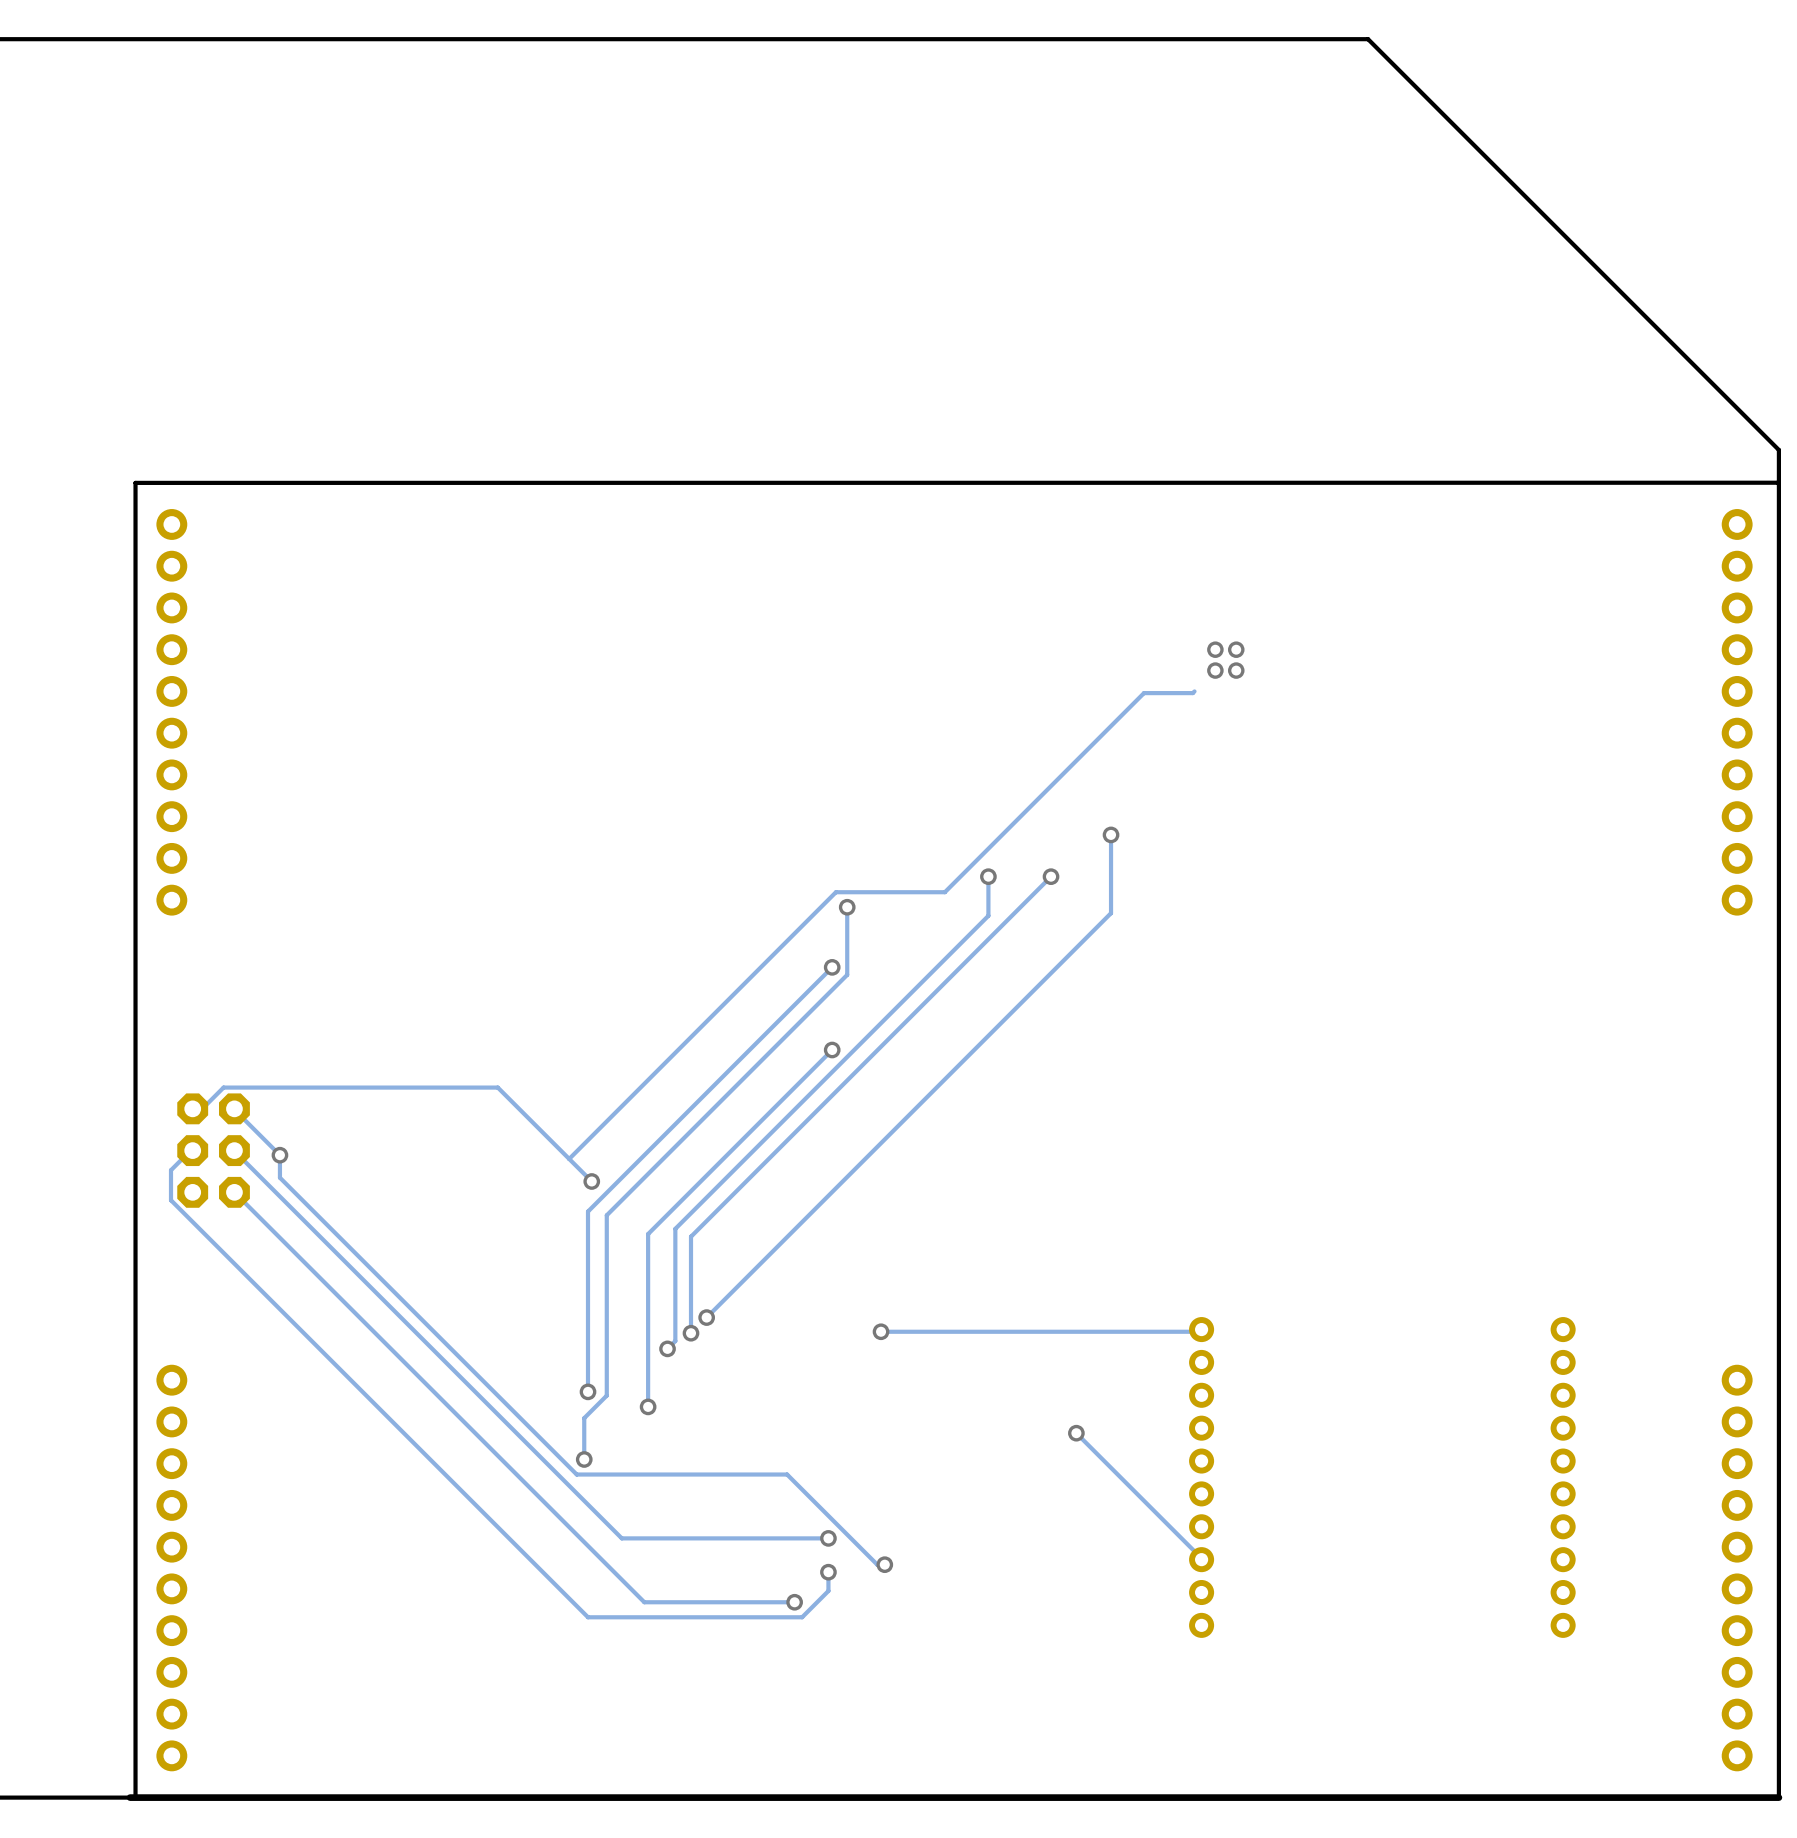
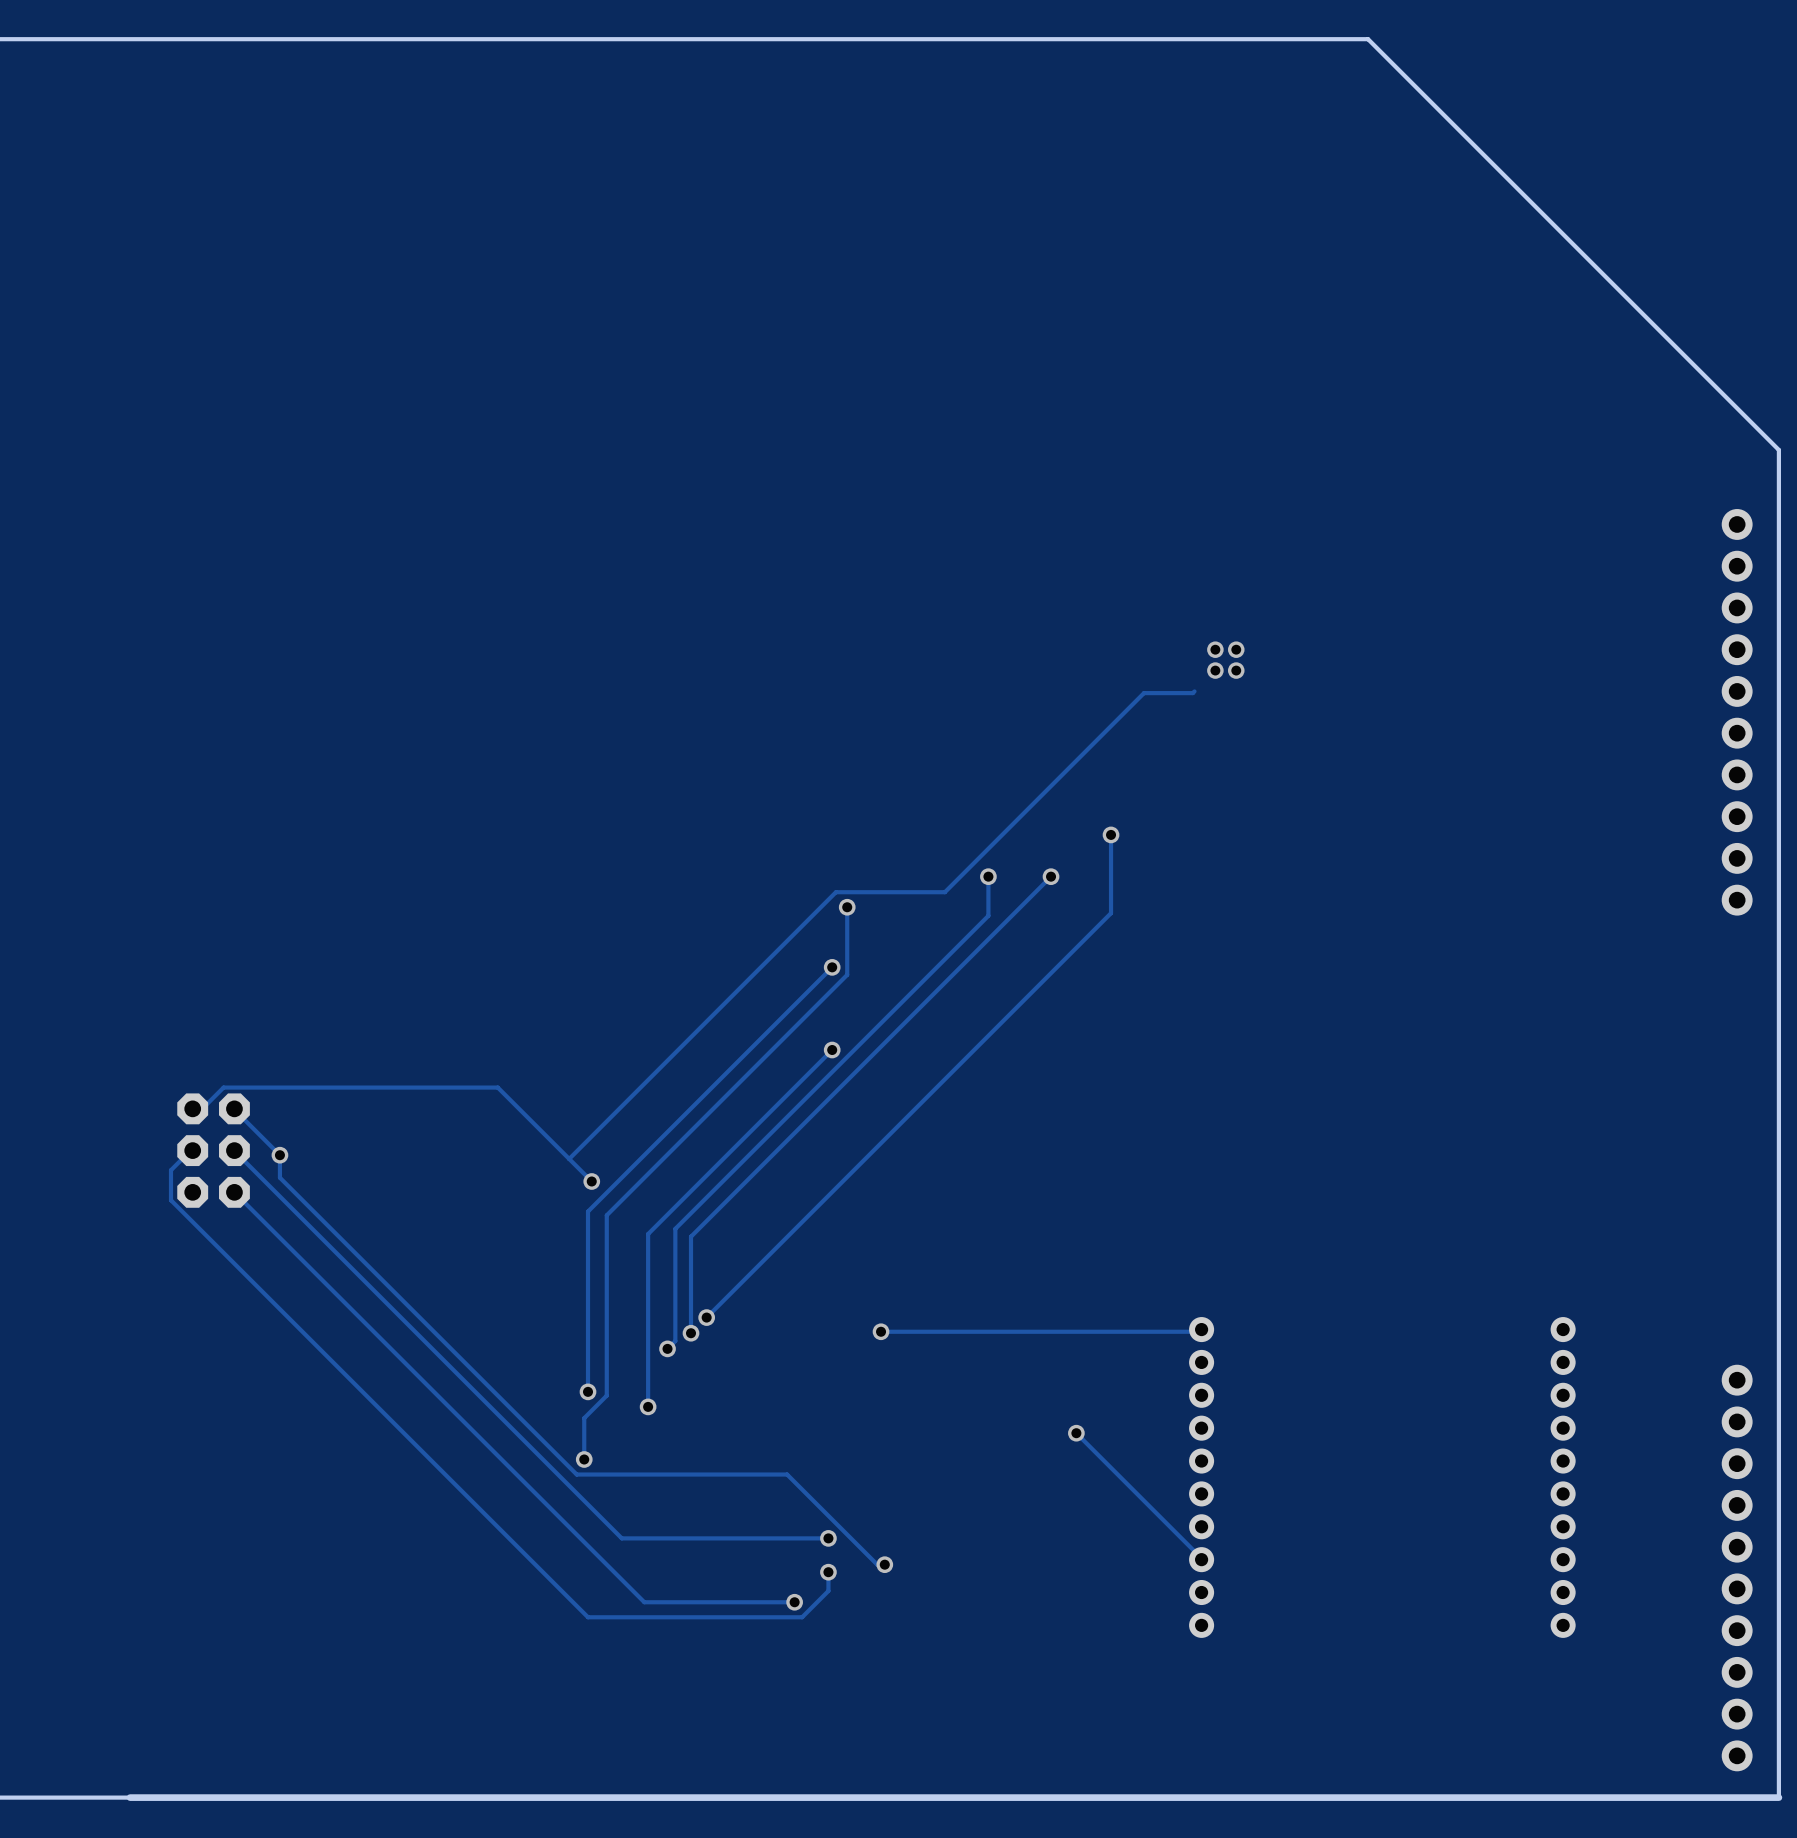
board edge: (1778, 482) (135, 482) (135, 1797) -> none
part: (171, 712) -> none
part: (171, 1568) -> none

